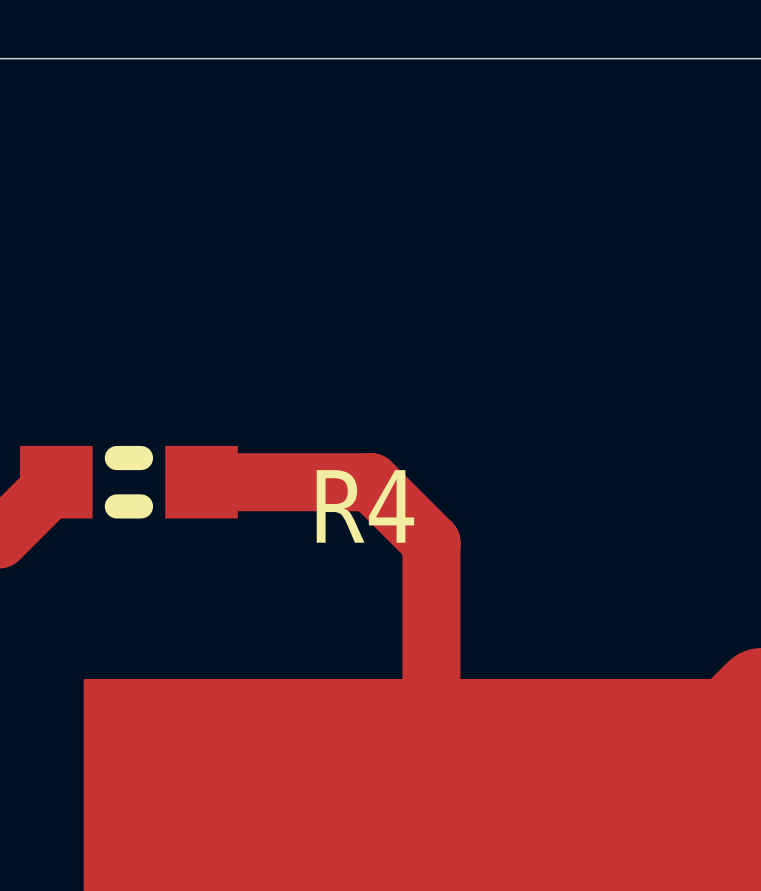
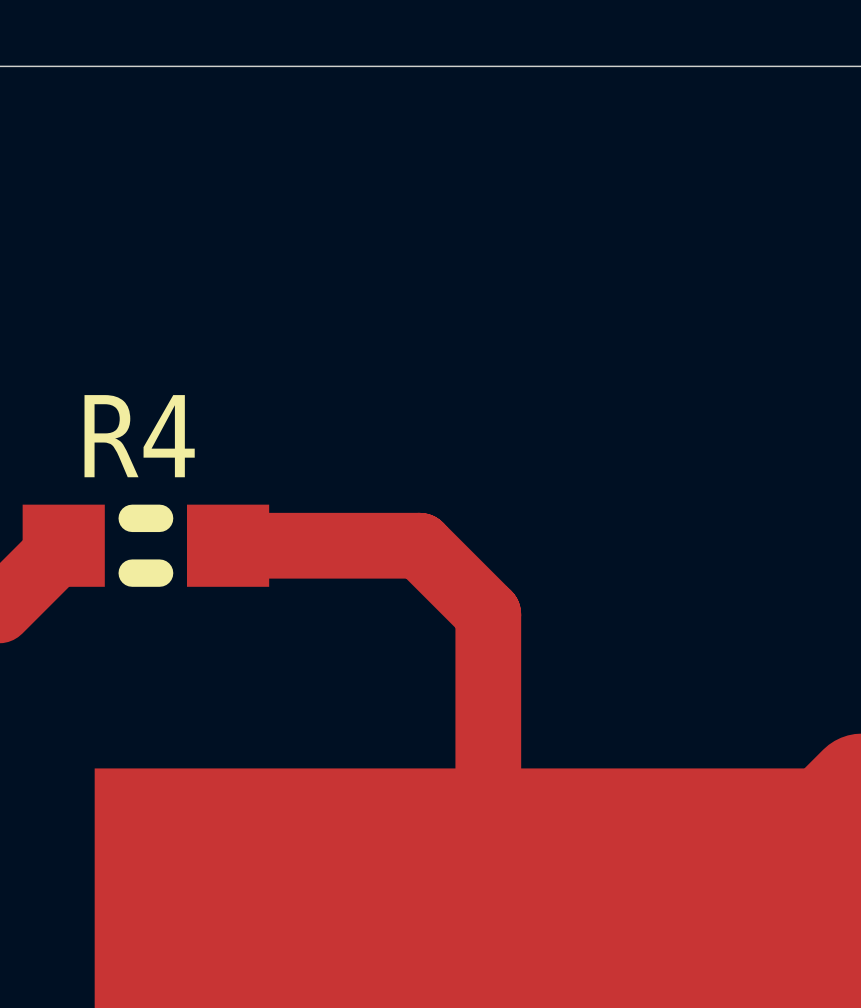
R4 name position: R4 (365, 506) -> R4 (139, 436)

